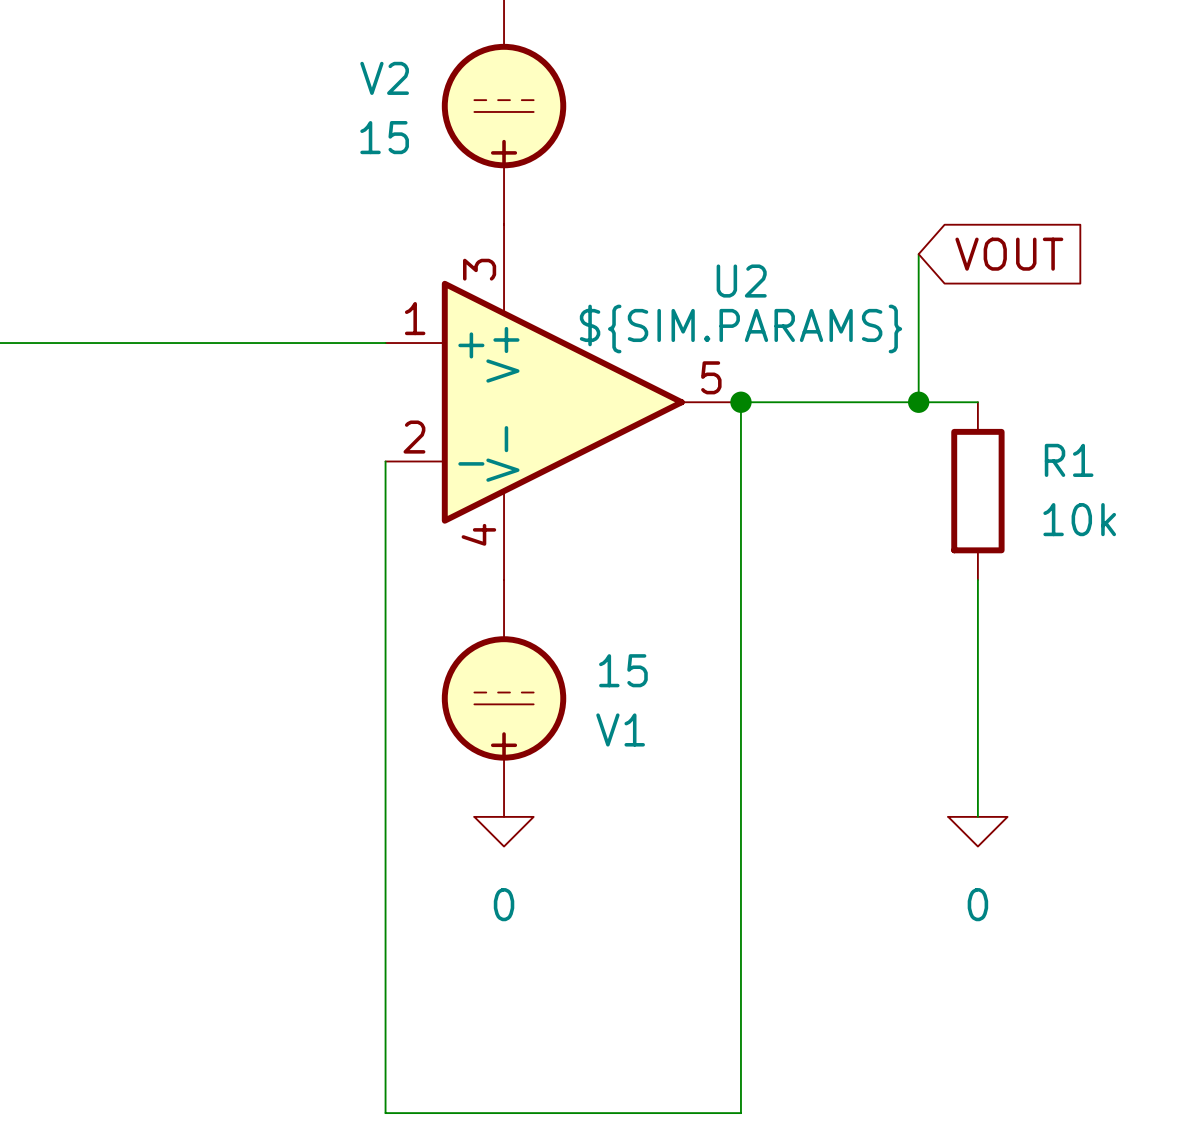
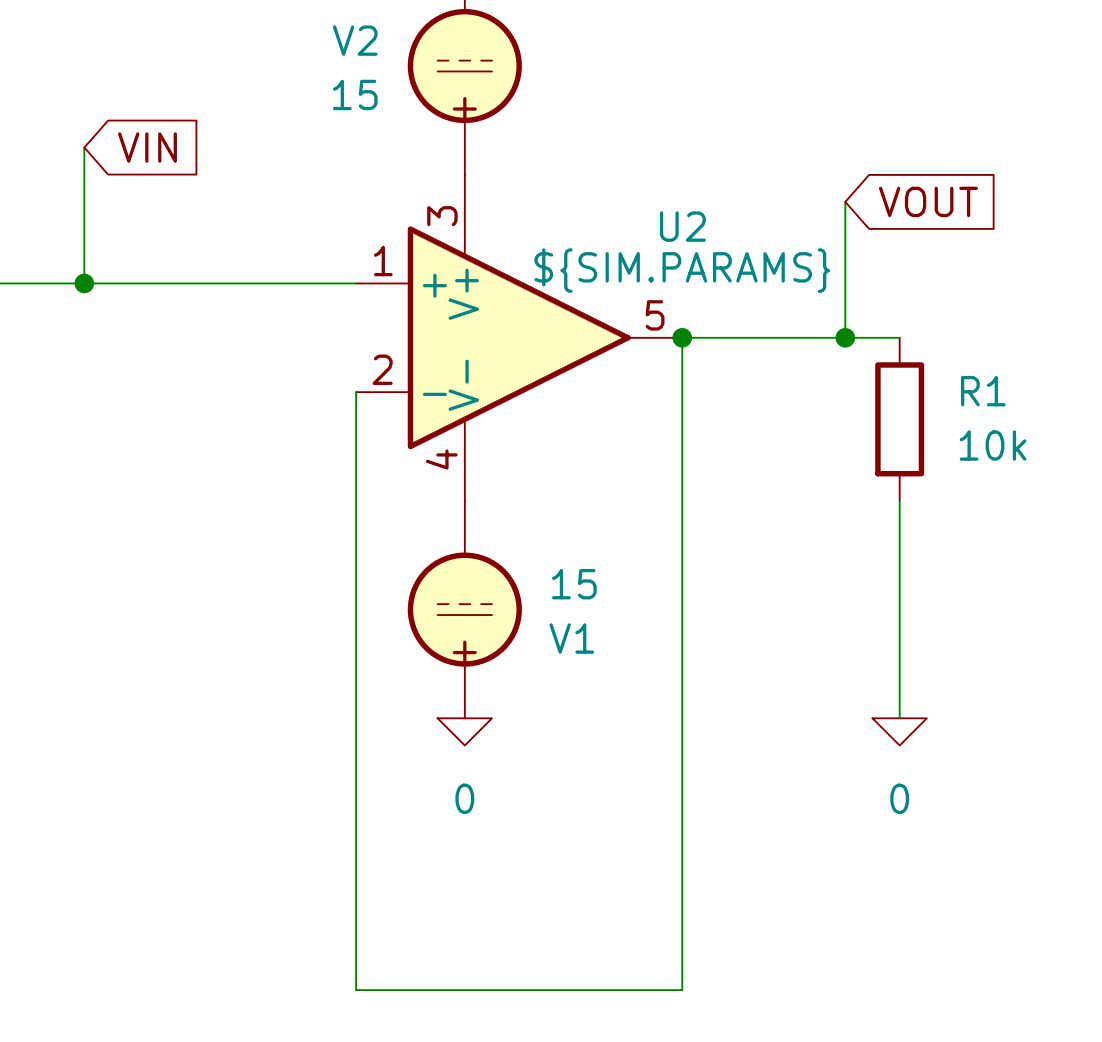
wire: none -> (84, 147) (84, 283)
global label: none -> VIN (147, 147)
junction: none -> (84, 283)

